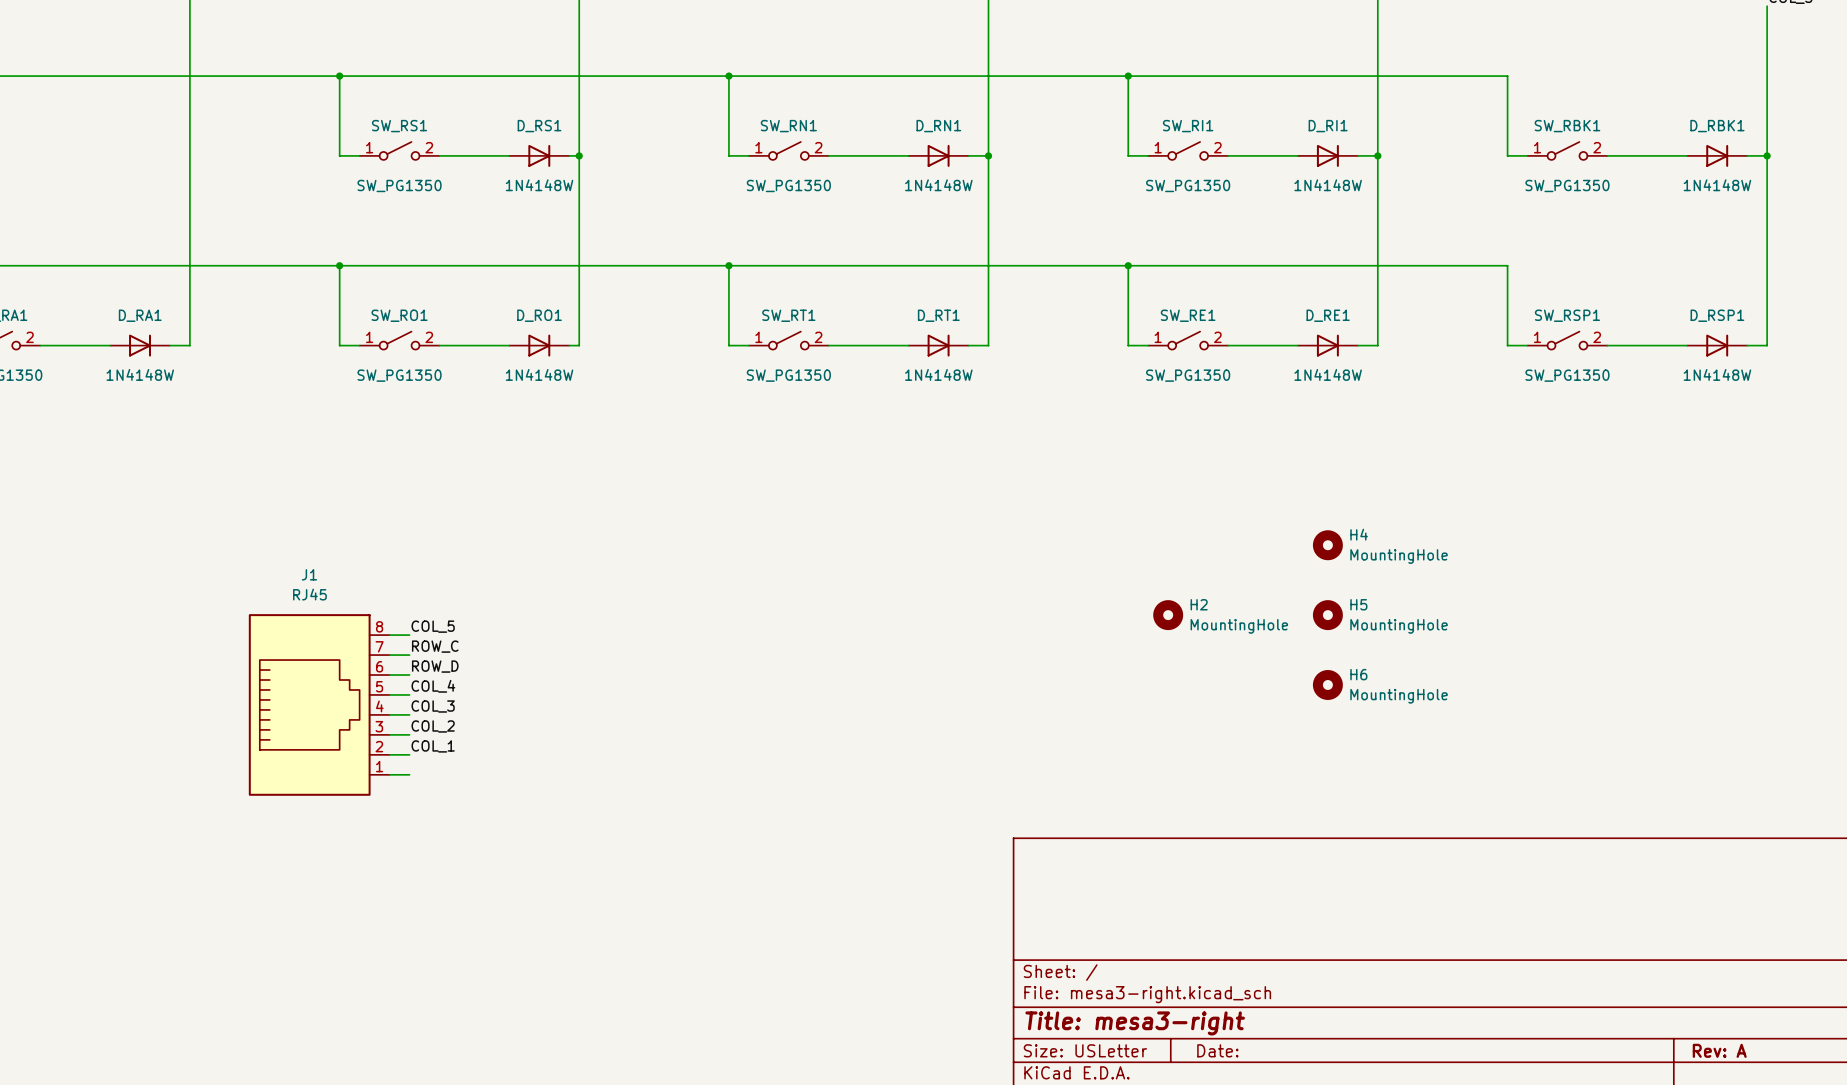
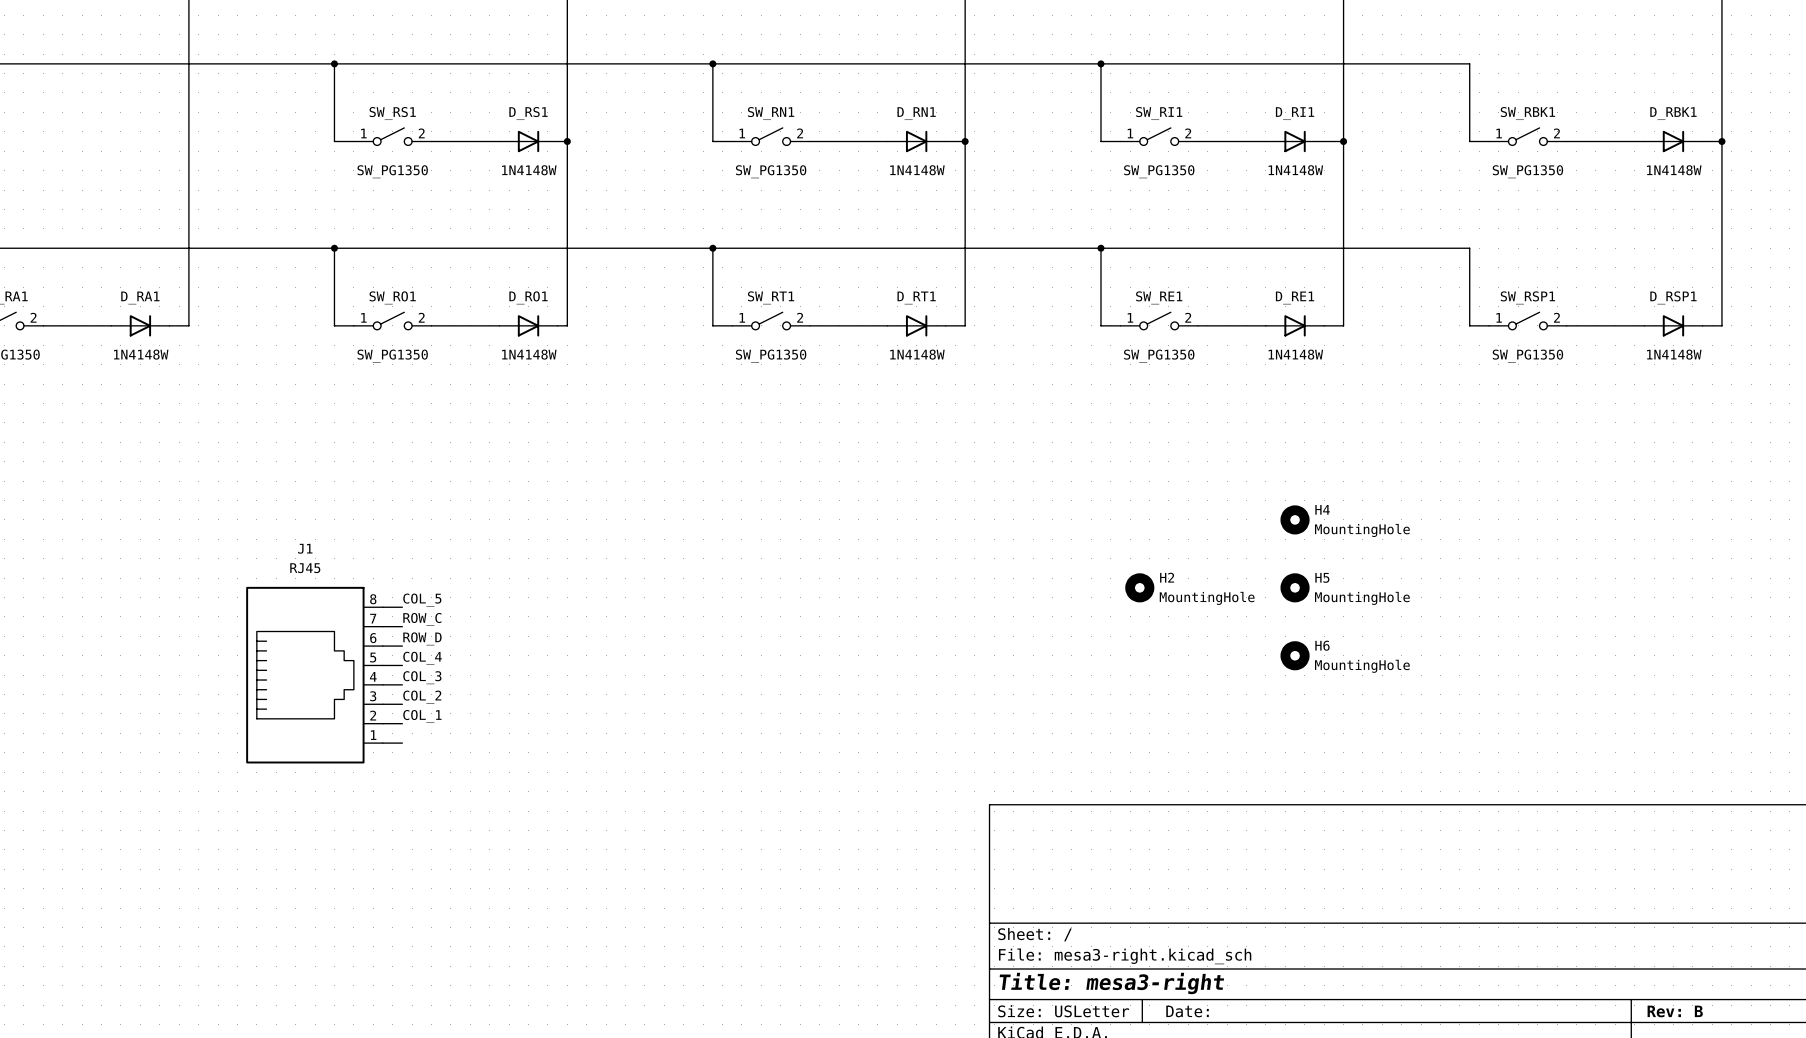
title block: Rev: A (1719, 1050) -> Rev: B (1675, 1011)

